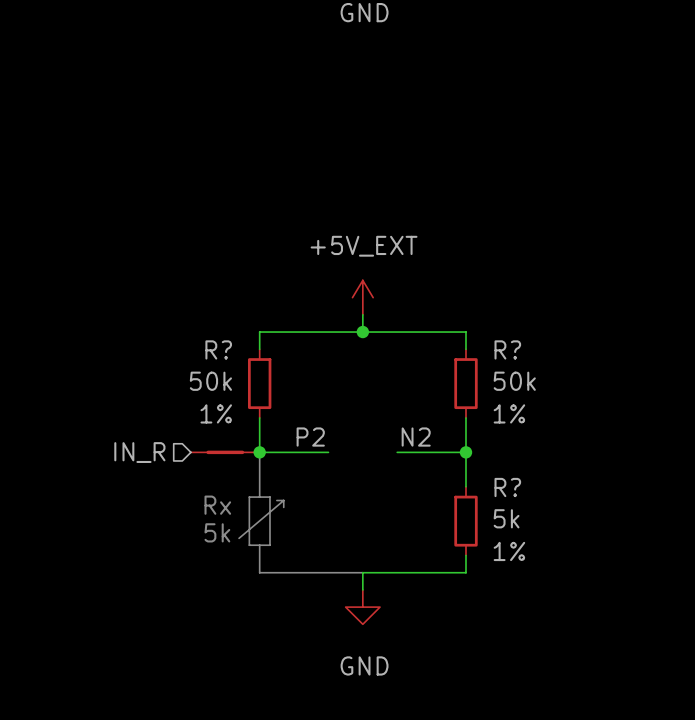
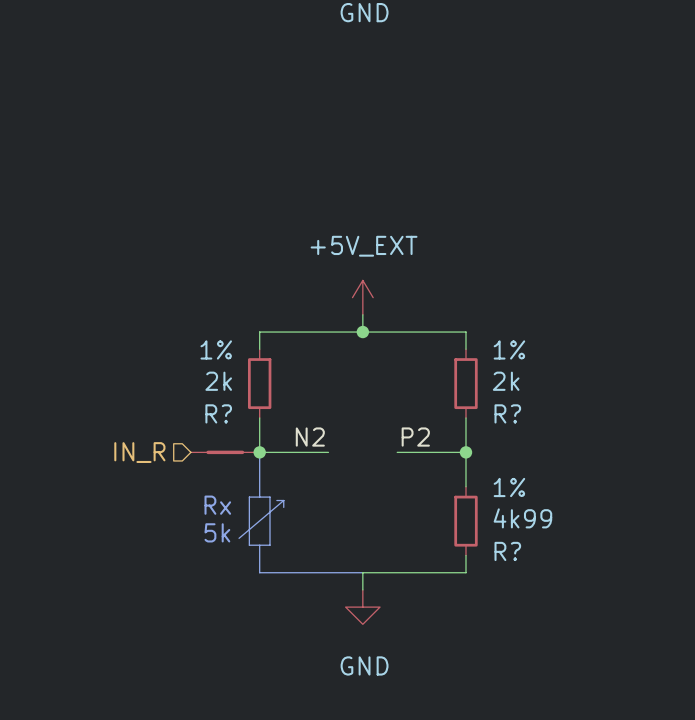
R? name position: R? (218, 349) -> R? (218, 413)
R? name position: R? (507, 349) -> R? (507, 413)
R? value: 50k (210, 381) -> 2k (218, 381)
R? value: 50k (514, 381) -> 2k (506, 381)
R? text position: 1% (216, 413) -> 1% (216, 349)
R? text position: 1% (509, 413) -> 1% (509, 349)
label: P2 (310, 437) -> N2 (310, 437)
label: N2 (416, 437) -> P2 (415, 437)
R? name position: R? (507, 487) -> R? (507, 551)
R? value: 5k (506, 518) -> 4k99 (522, 518)
R? text position: 1% (509, 551) -> 1% (509, 487)

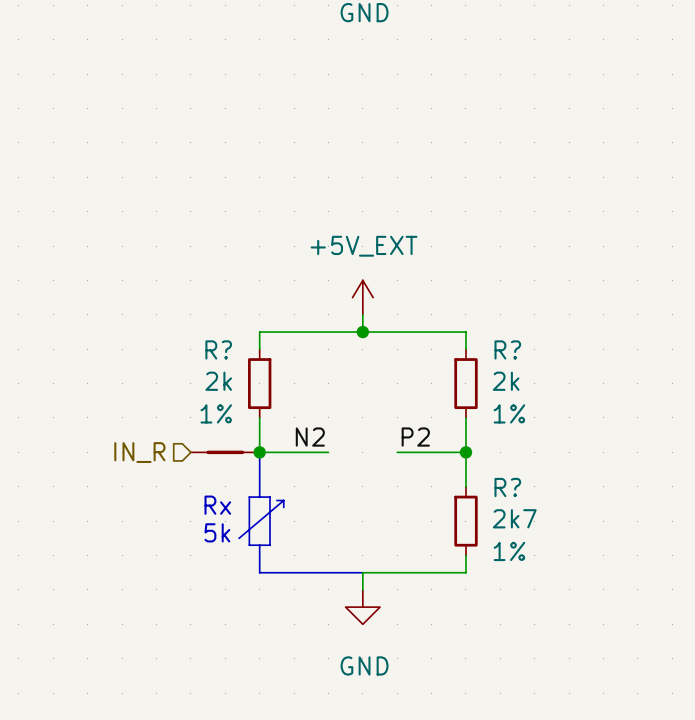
R? text position: 1% (216, 349) -> 1% (216, 413)
R? text position: 1% (509, 349) -> 1% (509, 413)
R? name position: R? (218, 413) -> R? (218, 349)
R? name position: R? (507, 413) -> R? (507, 349)
R? text position: 1% (509, 487) -> 1% (509, 551)
R? value: 4k99 (522, 518) -> 2k7 (514, 518)
R? name position: R? (507, 551) -> R? (507, 487)

